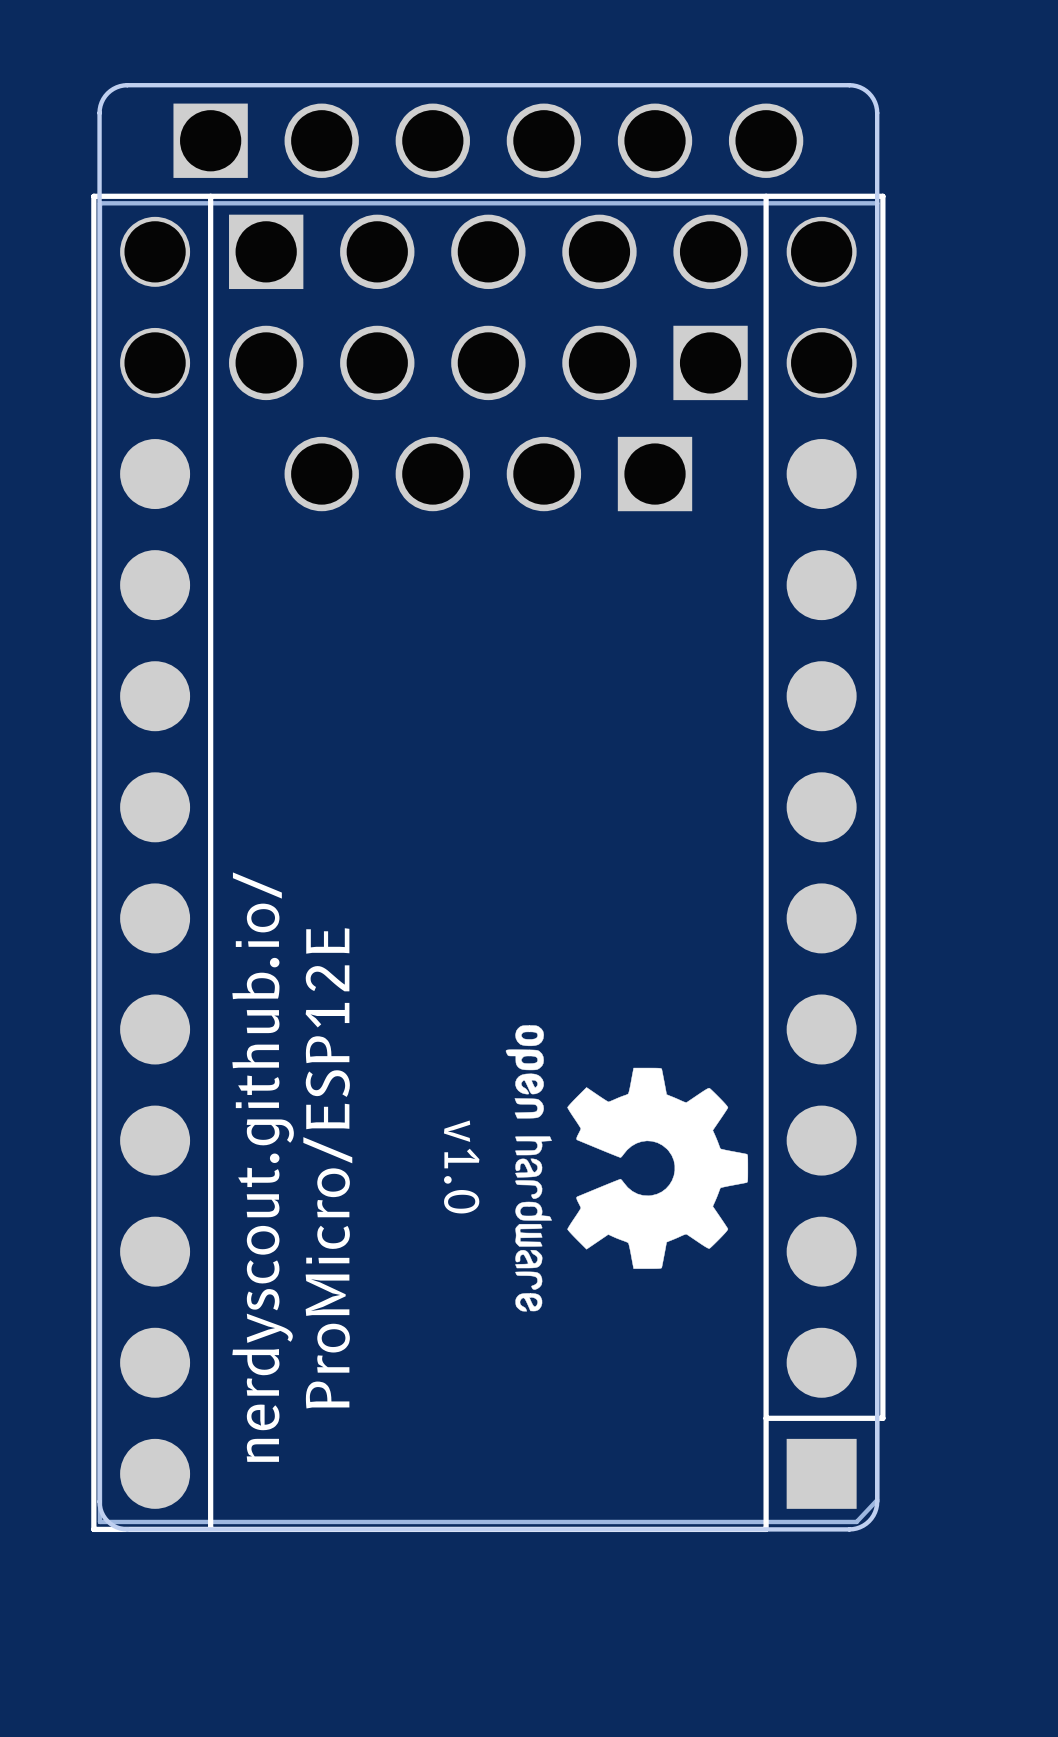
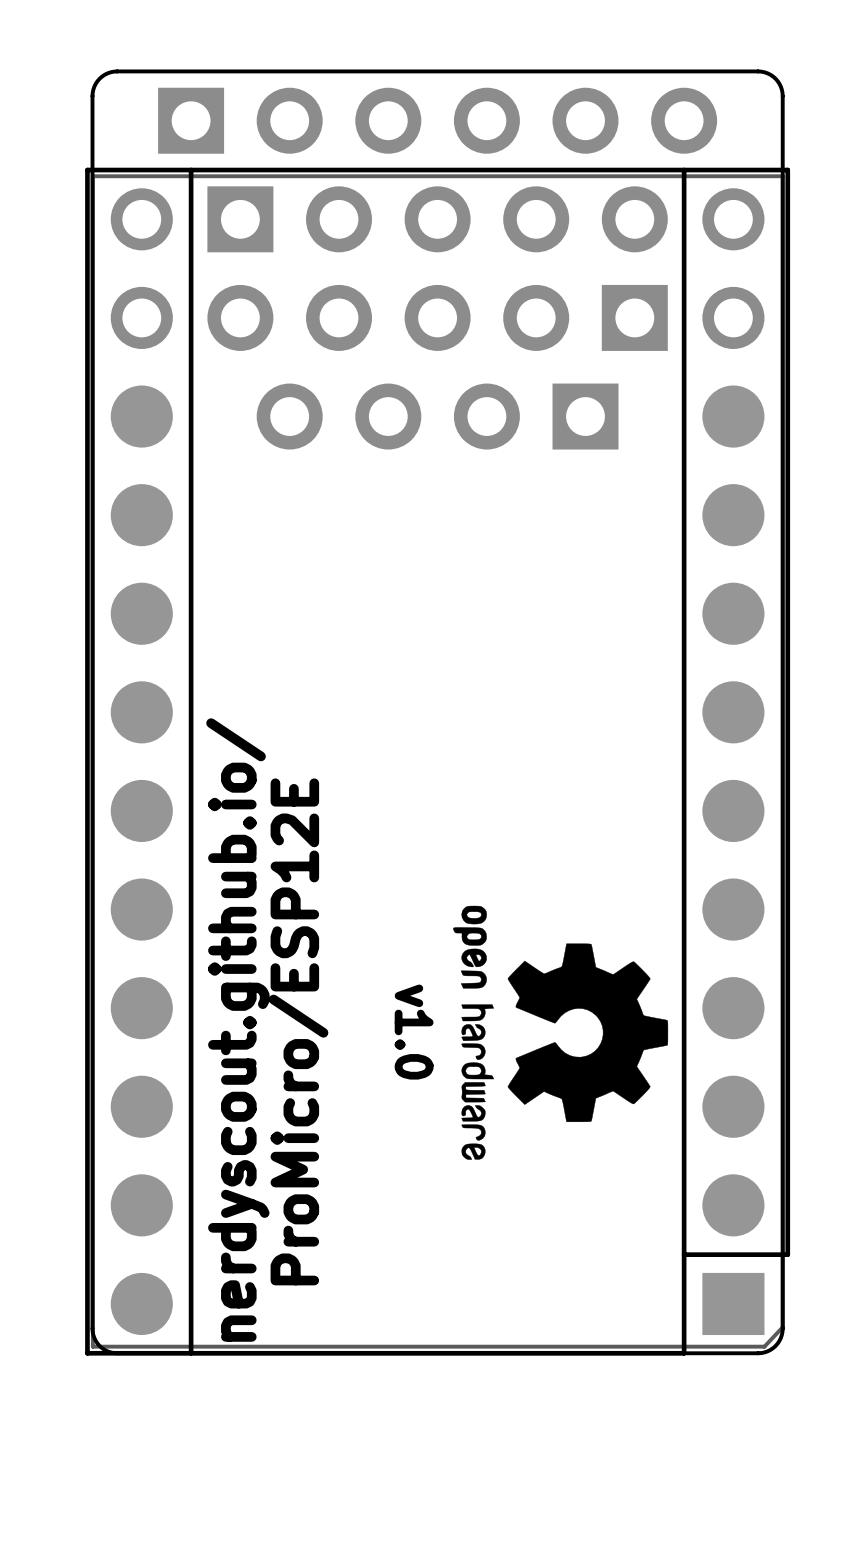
part footprint: [173, 103, 804, 178] -> [158, 87, 718, 154]
part footprint: [91, 193, 886, 1533] -> [85, 167, 791, 1356]
part footprint: [229, 214, 304, 401] -> [207, 186, 274, 351]
part footprint: [340, 214, 748, 401] -> [306, 186, 668, 351]
part footprint: [284, 436, 693, 512] -> [256, 383, 619, 450]

